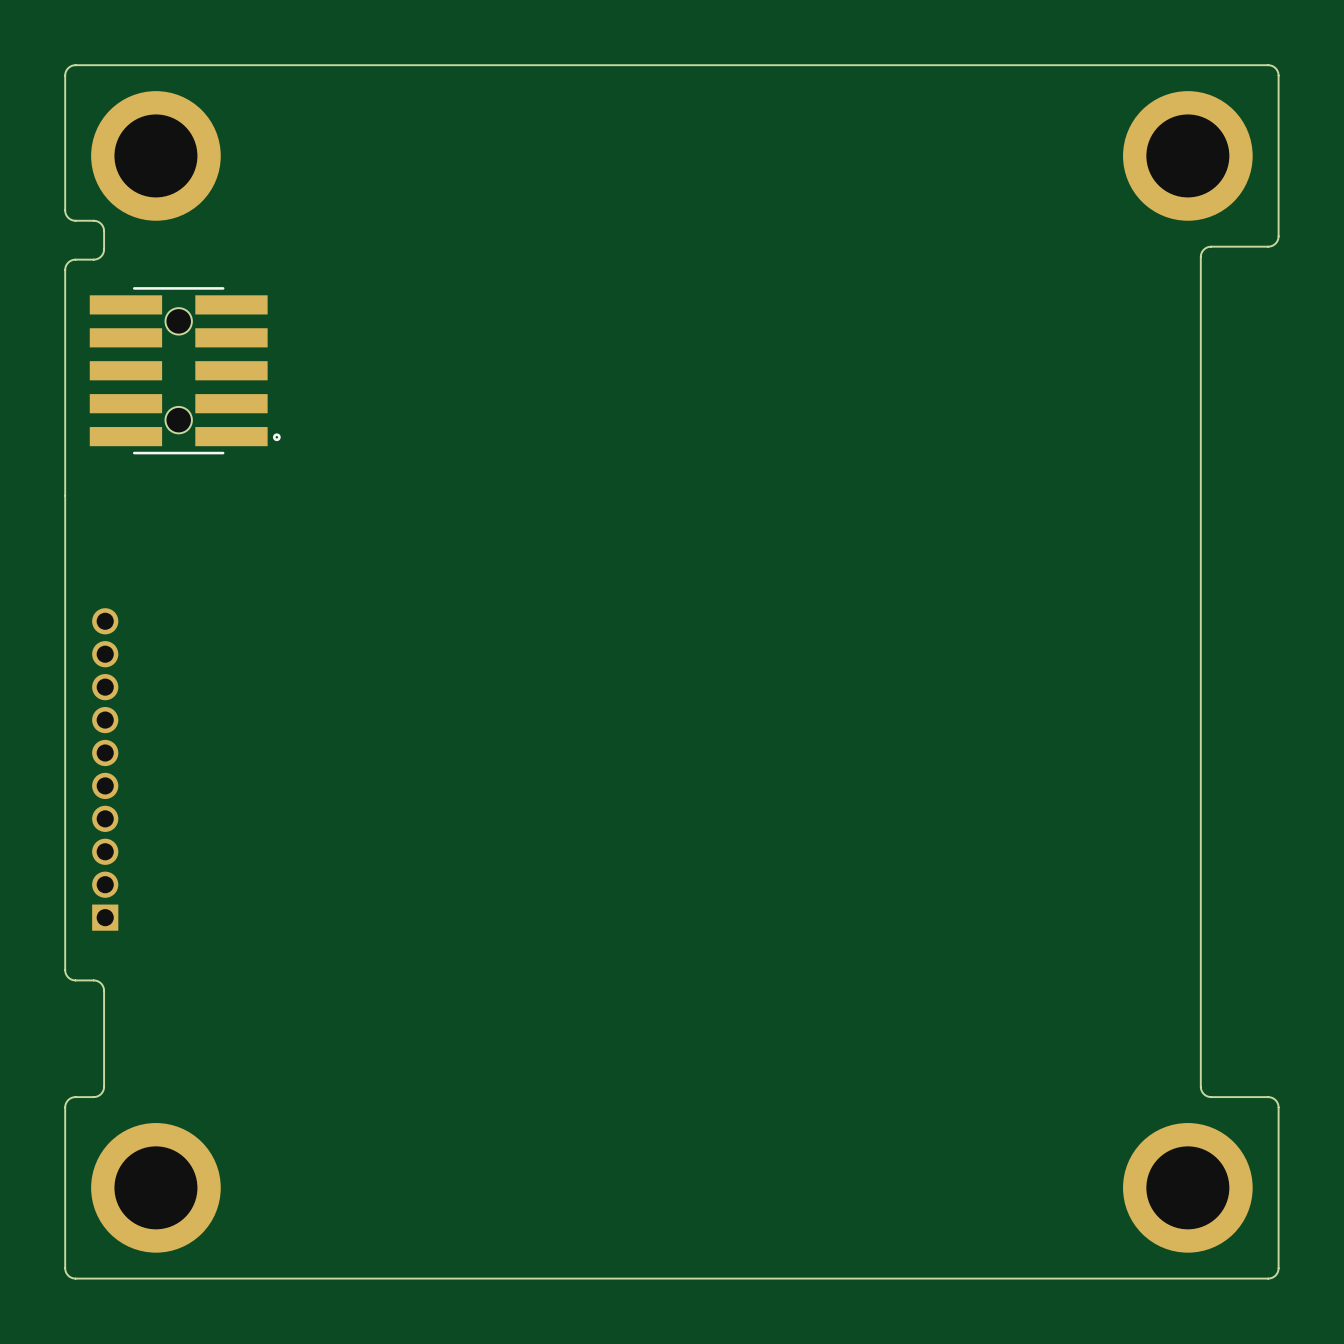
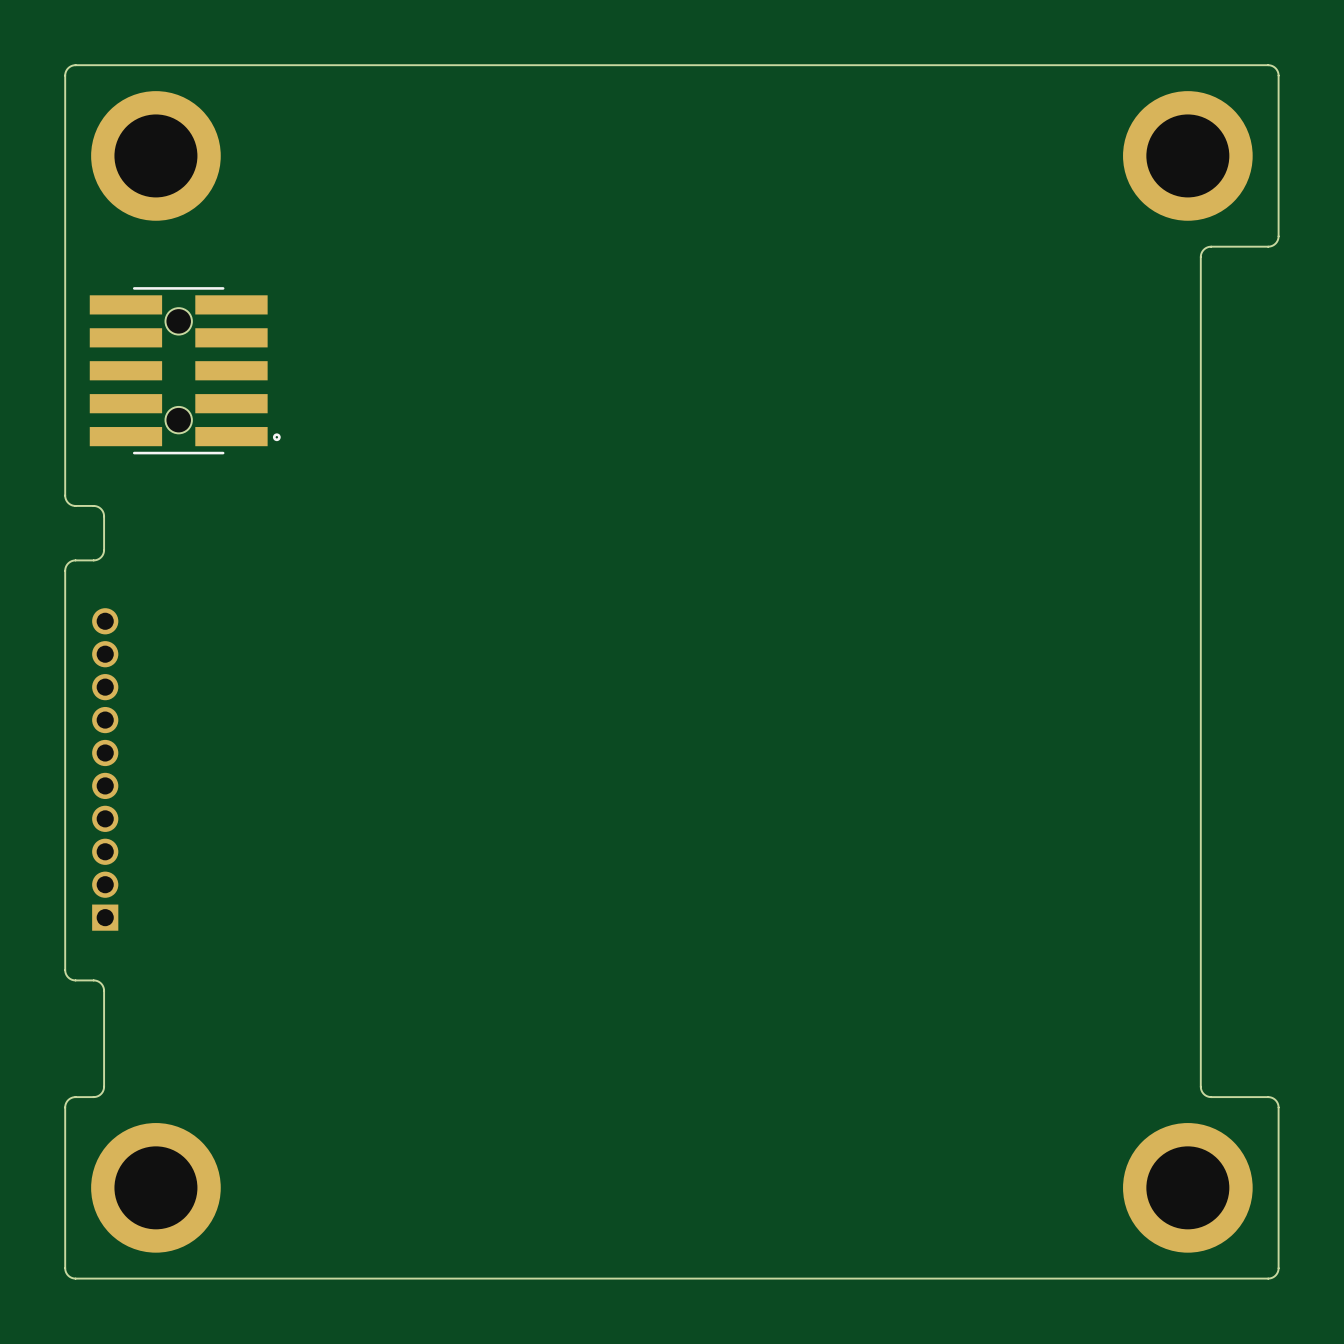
board edge: (65, 210) (66, 215) (71, 219) (97, 221) (102, 225) (104, 231) (104, 250) (101, 256) (94, 259) (72, 260) (66, 264) (65, 270) -> (65, 210) (65, 270)
board edge: (65, 495) (65, 570) -> (65, 495) (70, 504) (97, 506) (101, 509) (104, 516) (104, 550) (101, 556) (95, 560) (71, 561) (66, 565) (65, 570)

